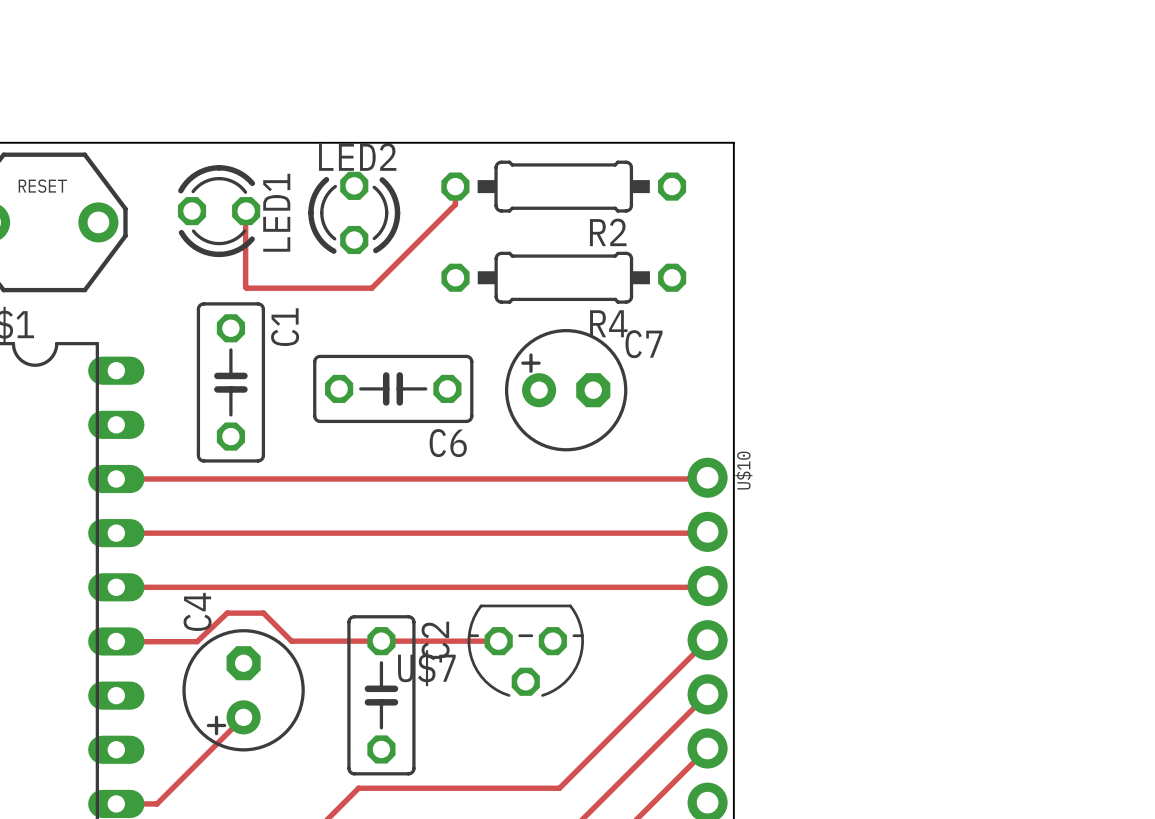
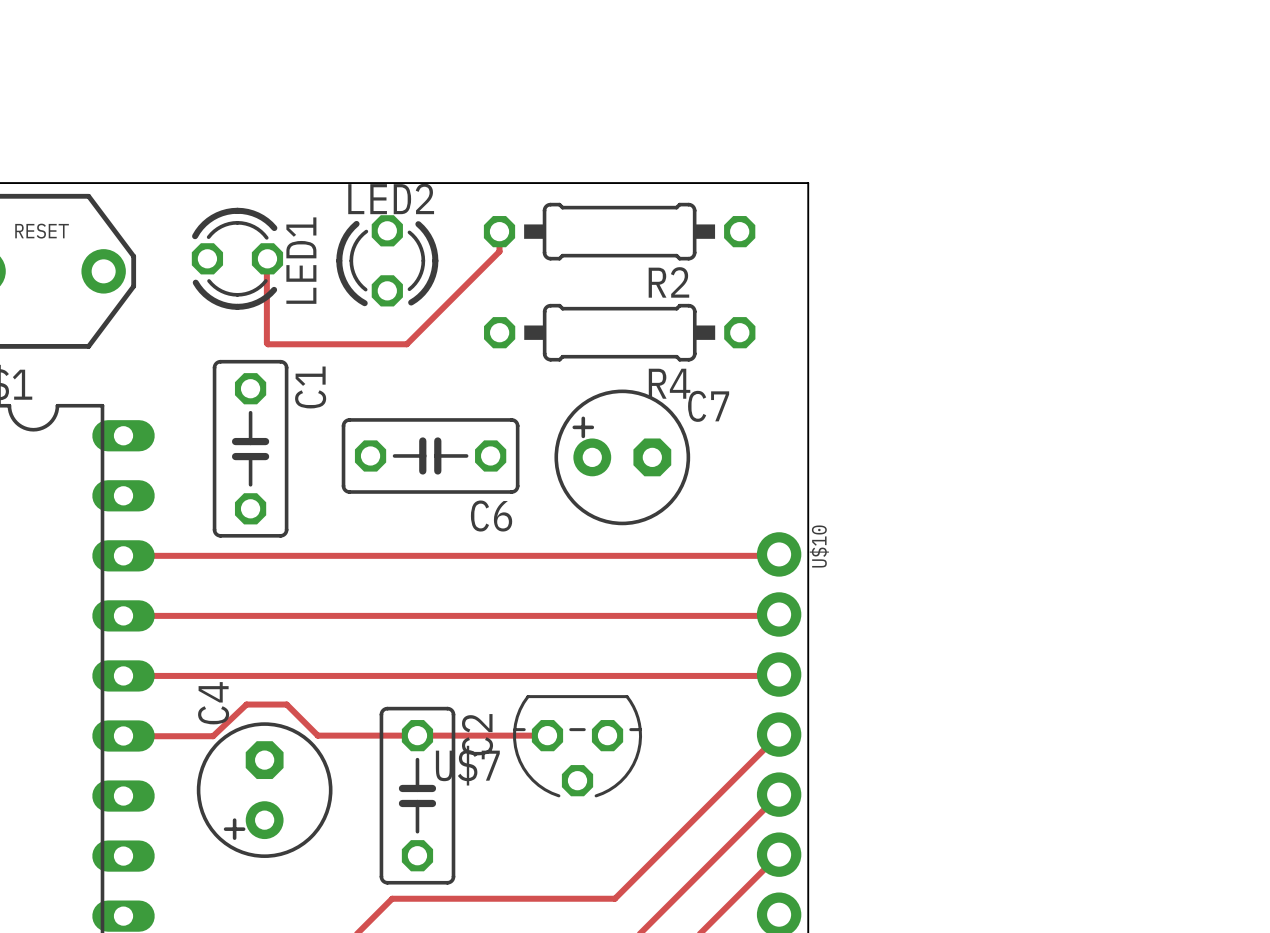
track: (243, 717) (157, 803) (116, 803) -> none

